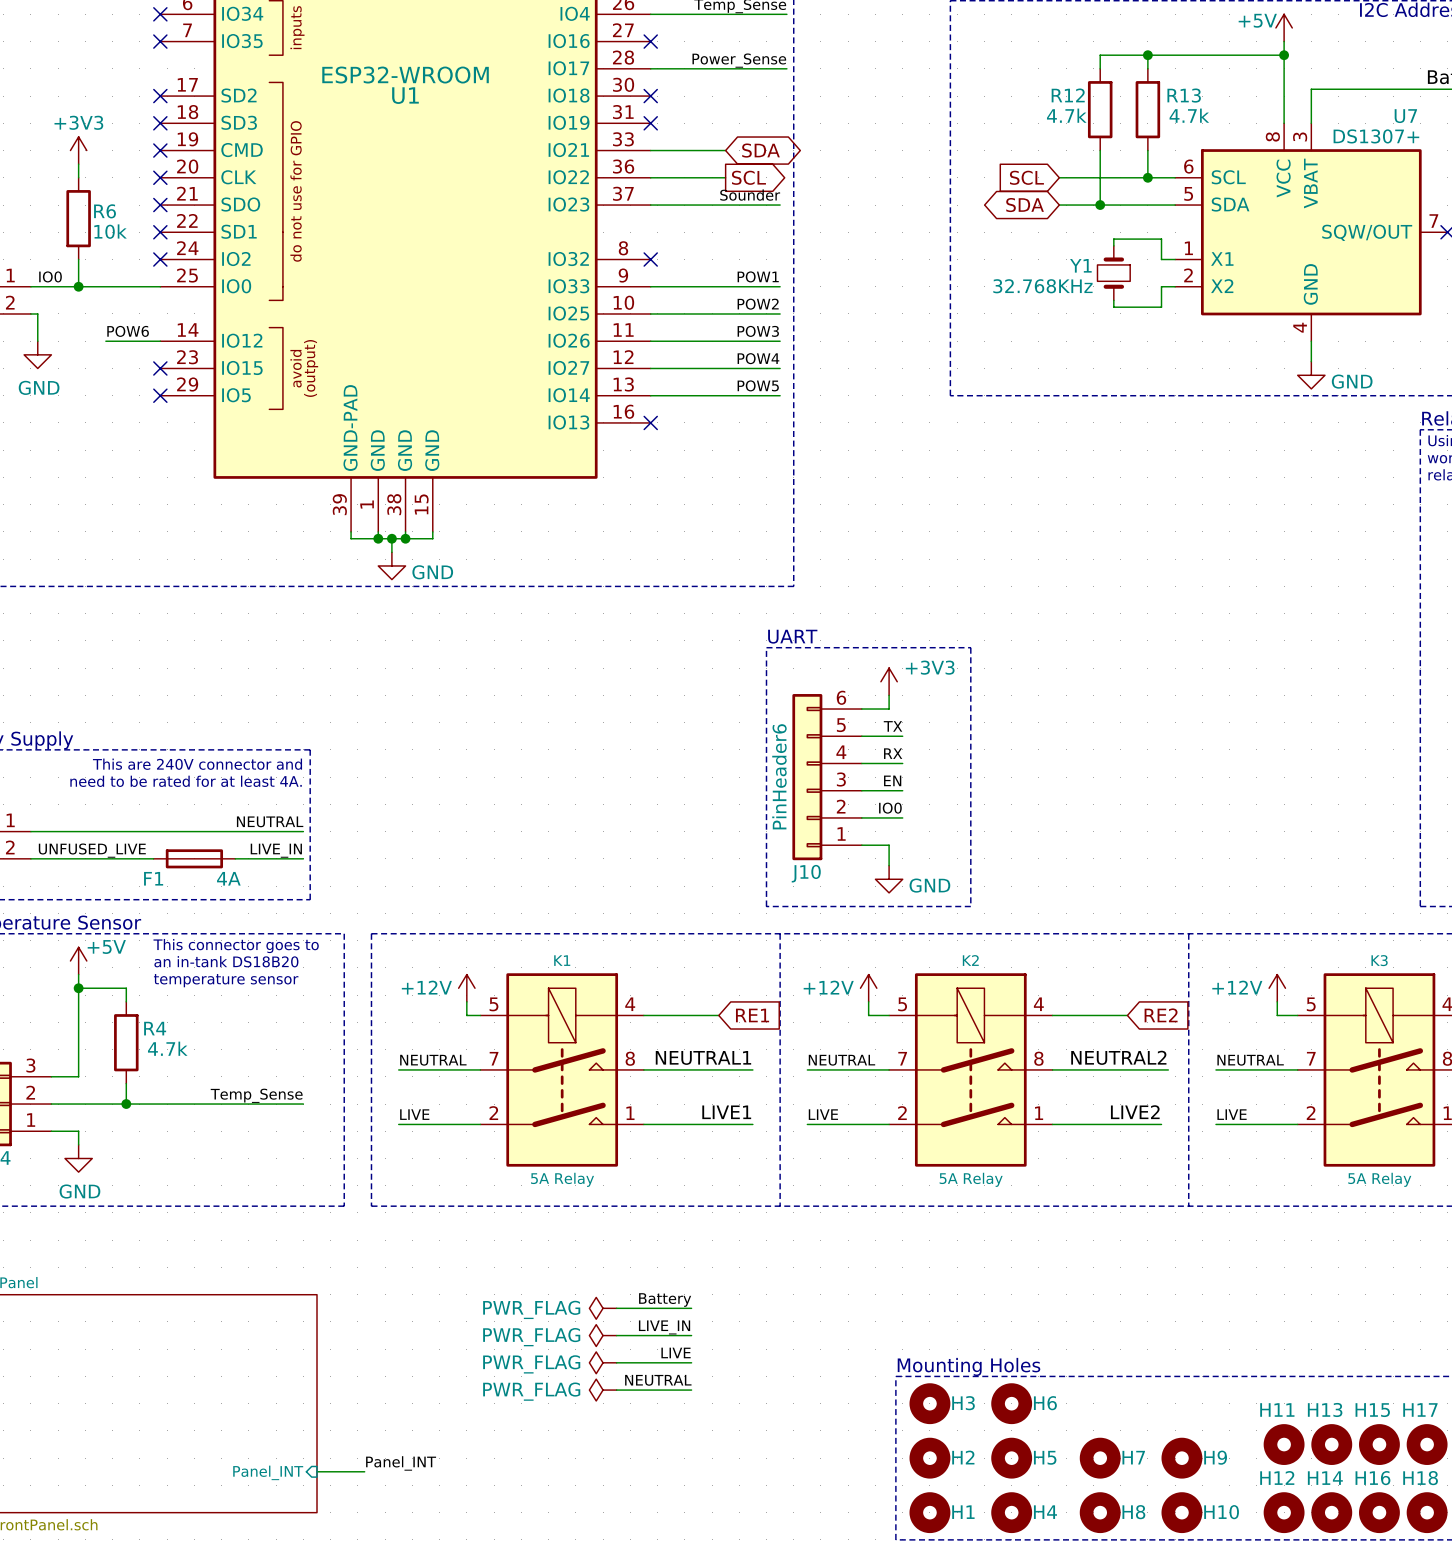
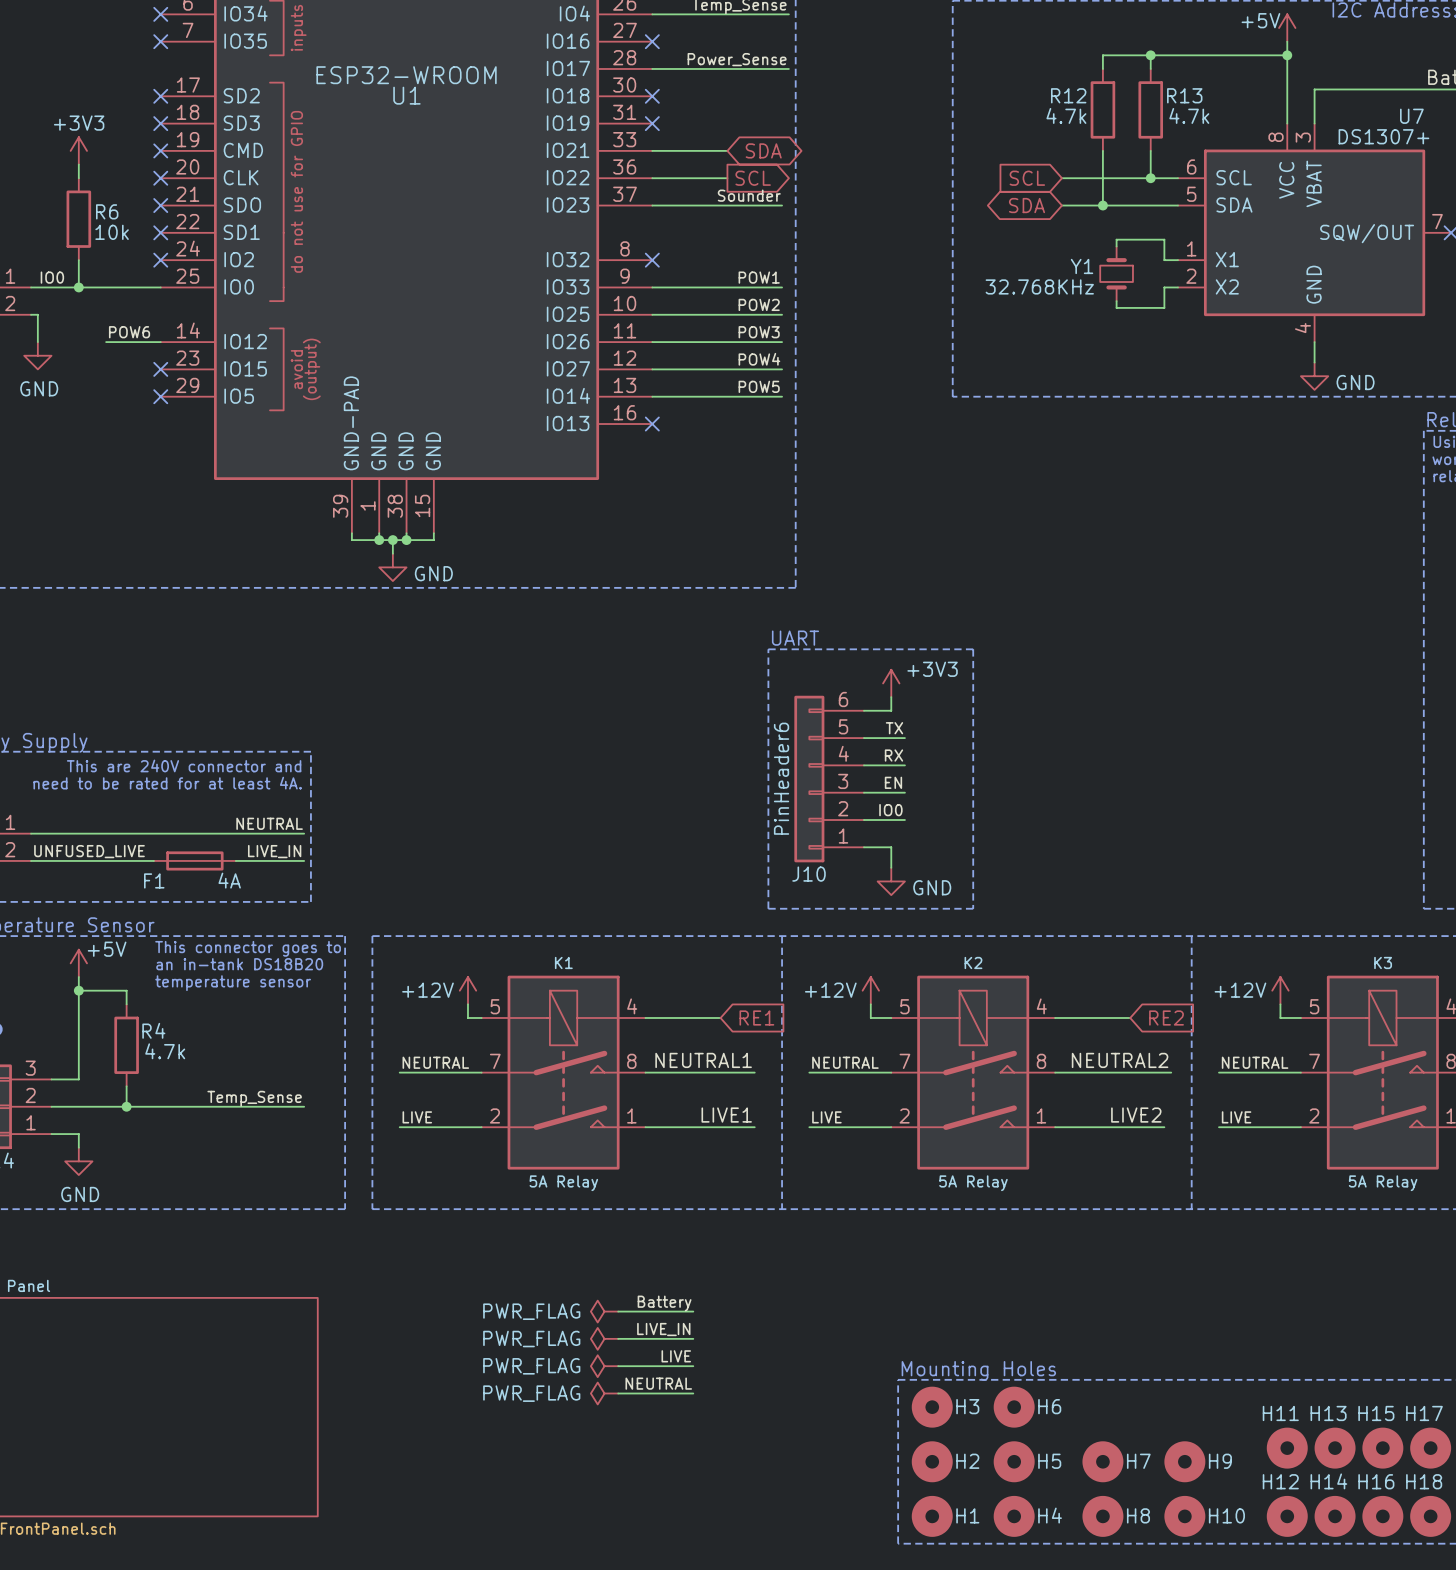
label: Panel_INT (401, 1463) -> none
wire: (317, 1471) (364, 1471) -> none
sheet pin: Panel_INT (268, 1472) -> none

